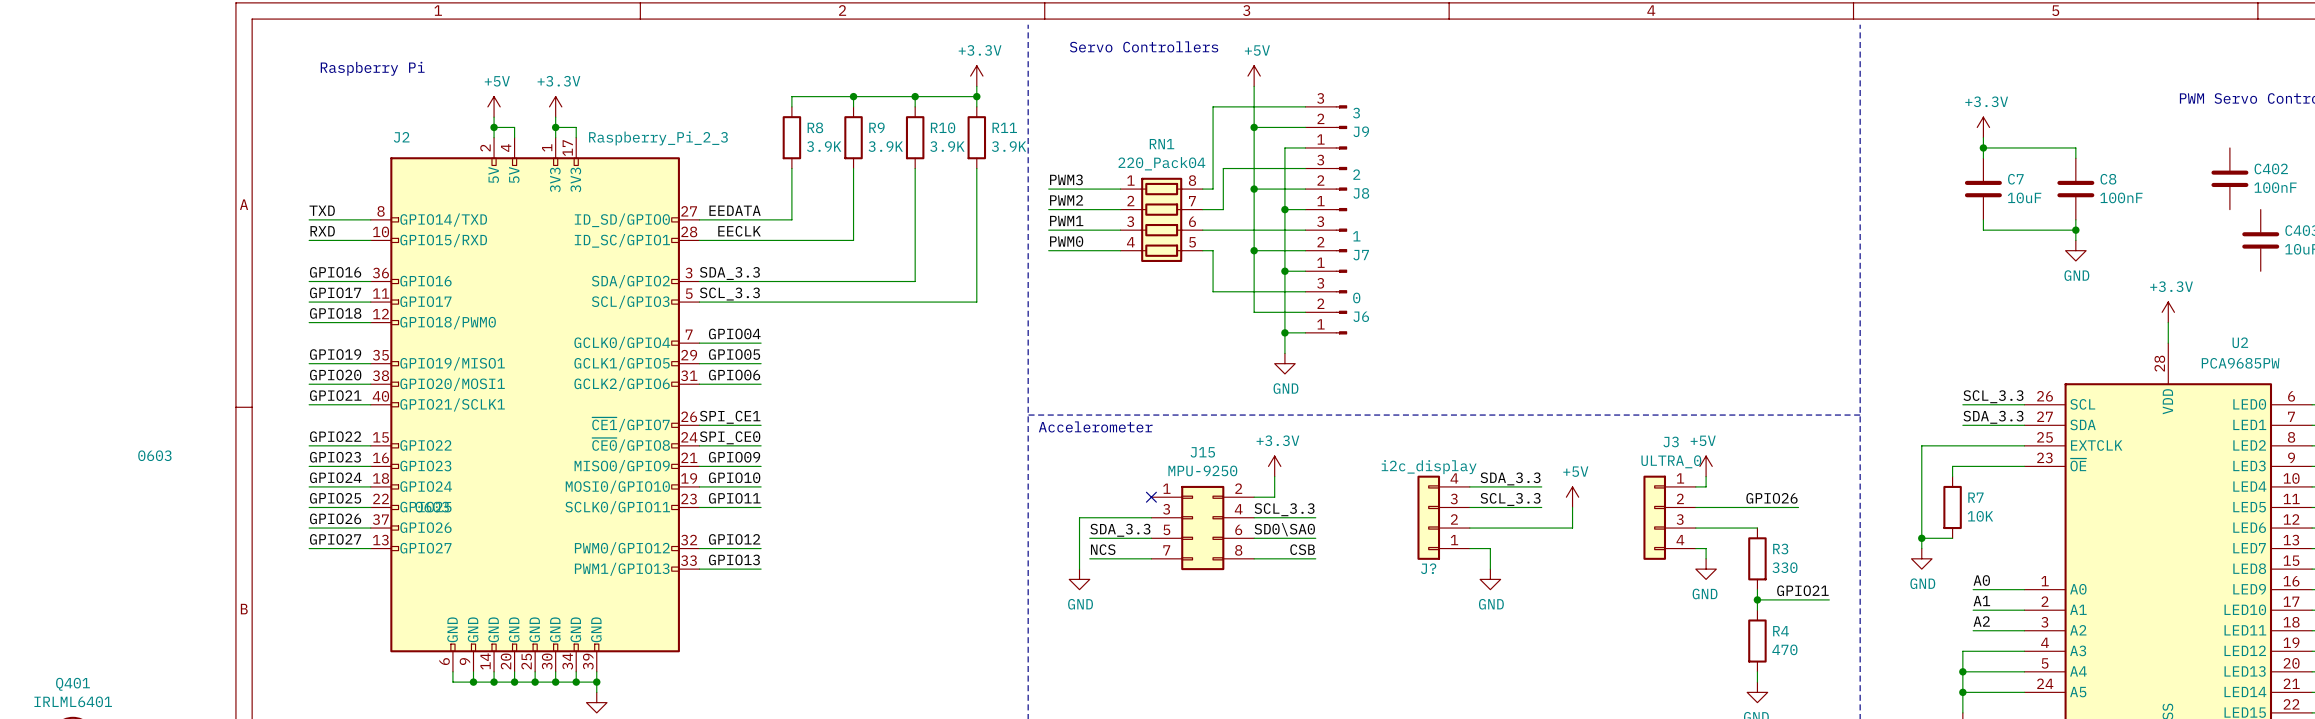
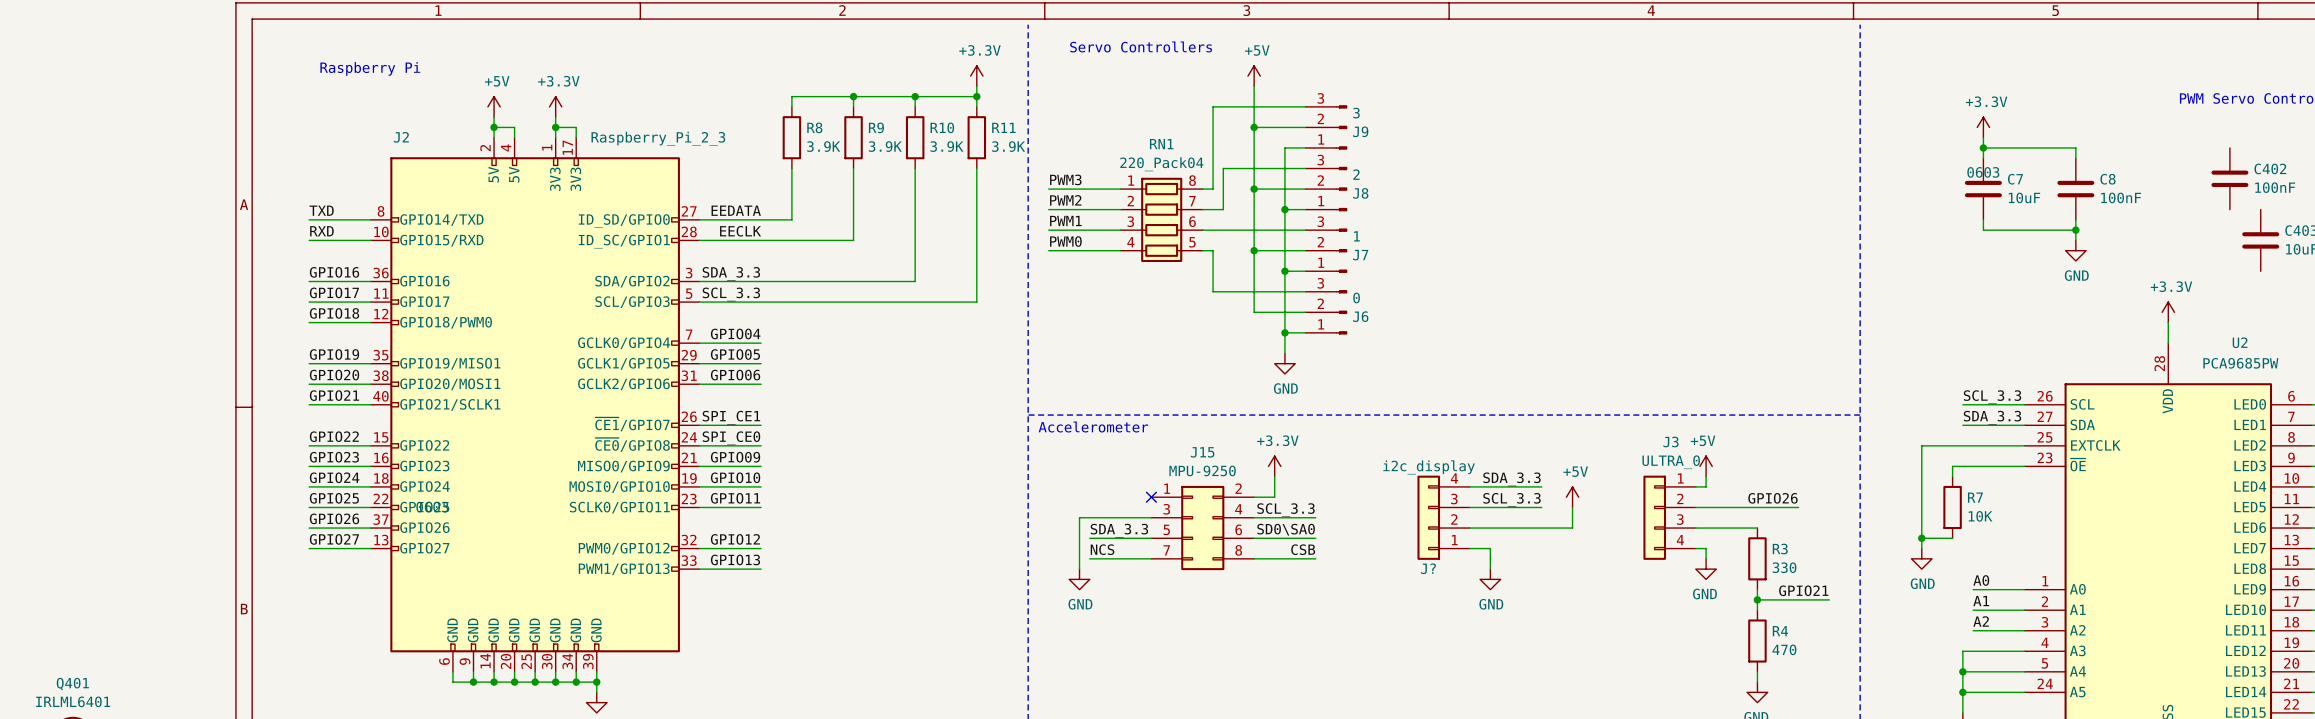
C7 text position: 0603 (154, 455) -> 0603 (1983, 172)

